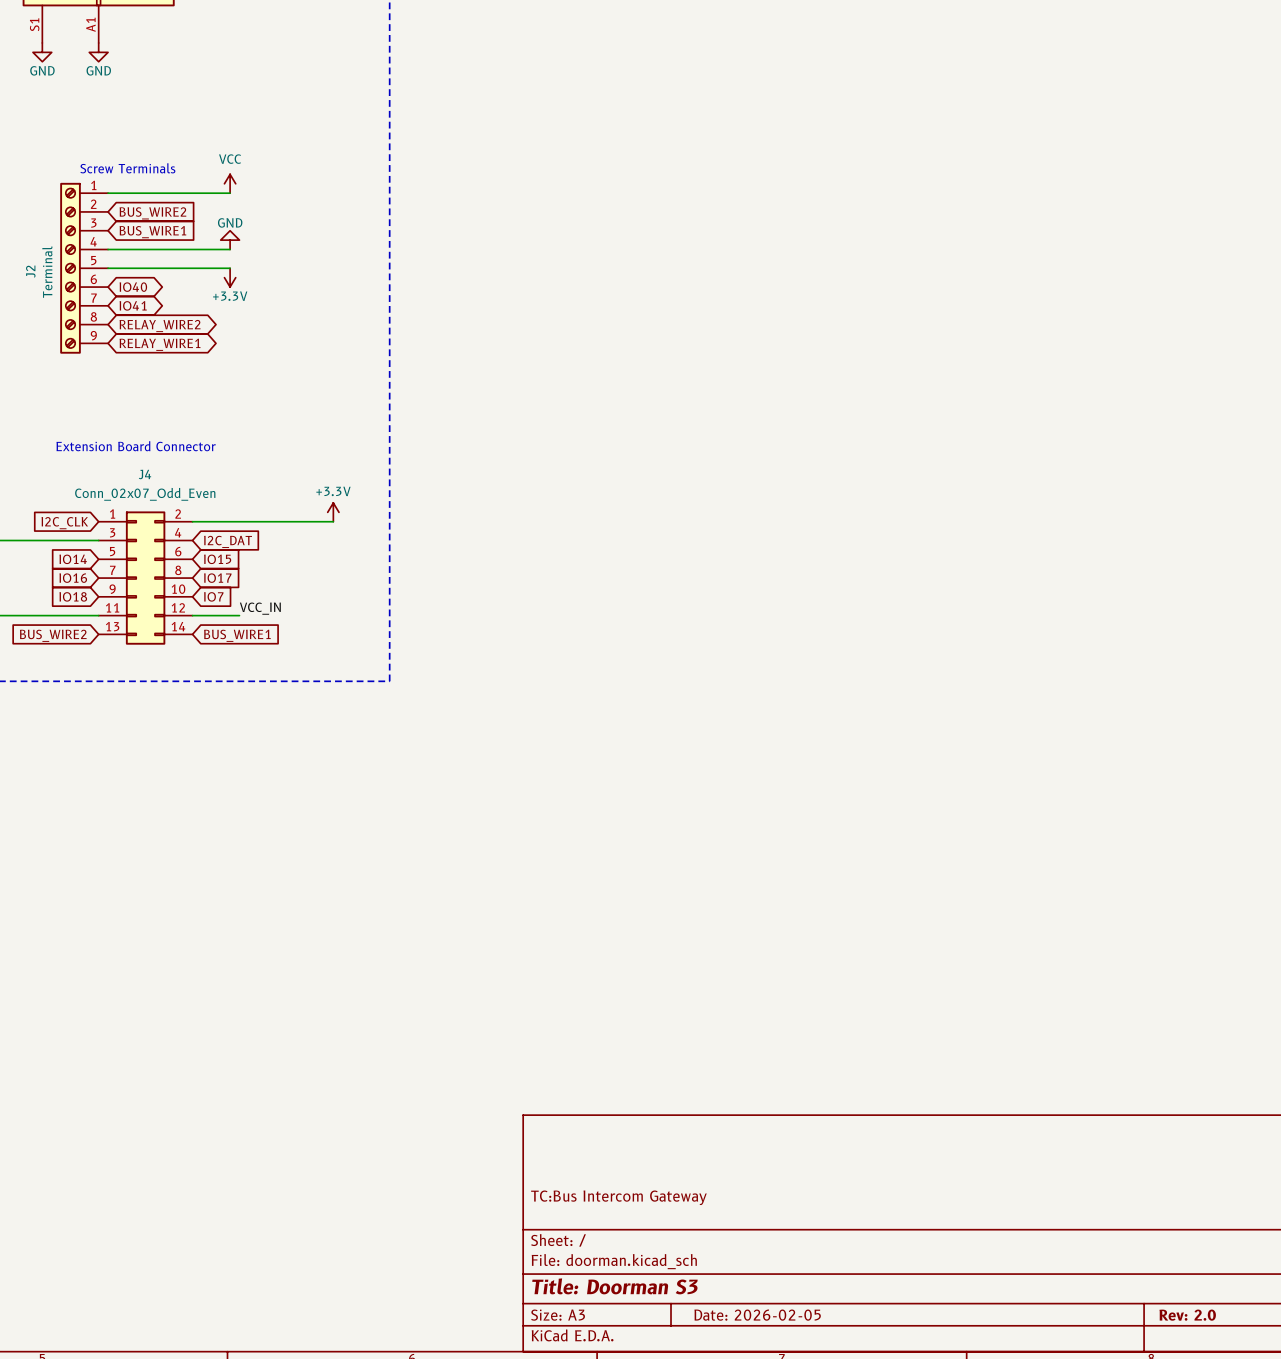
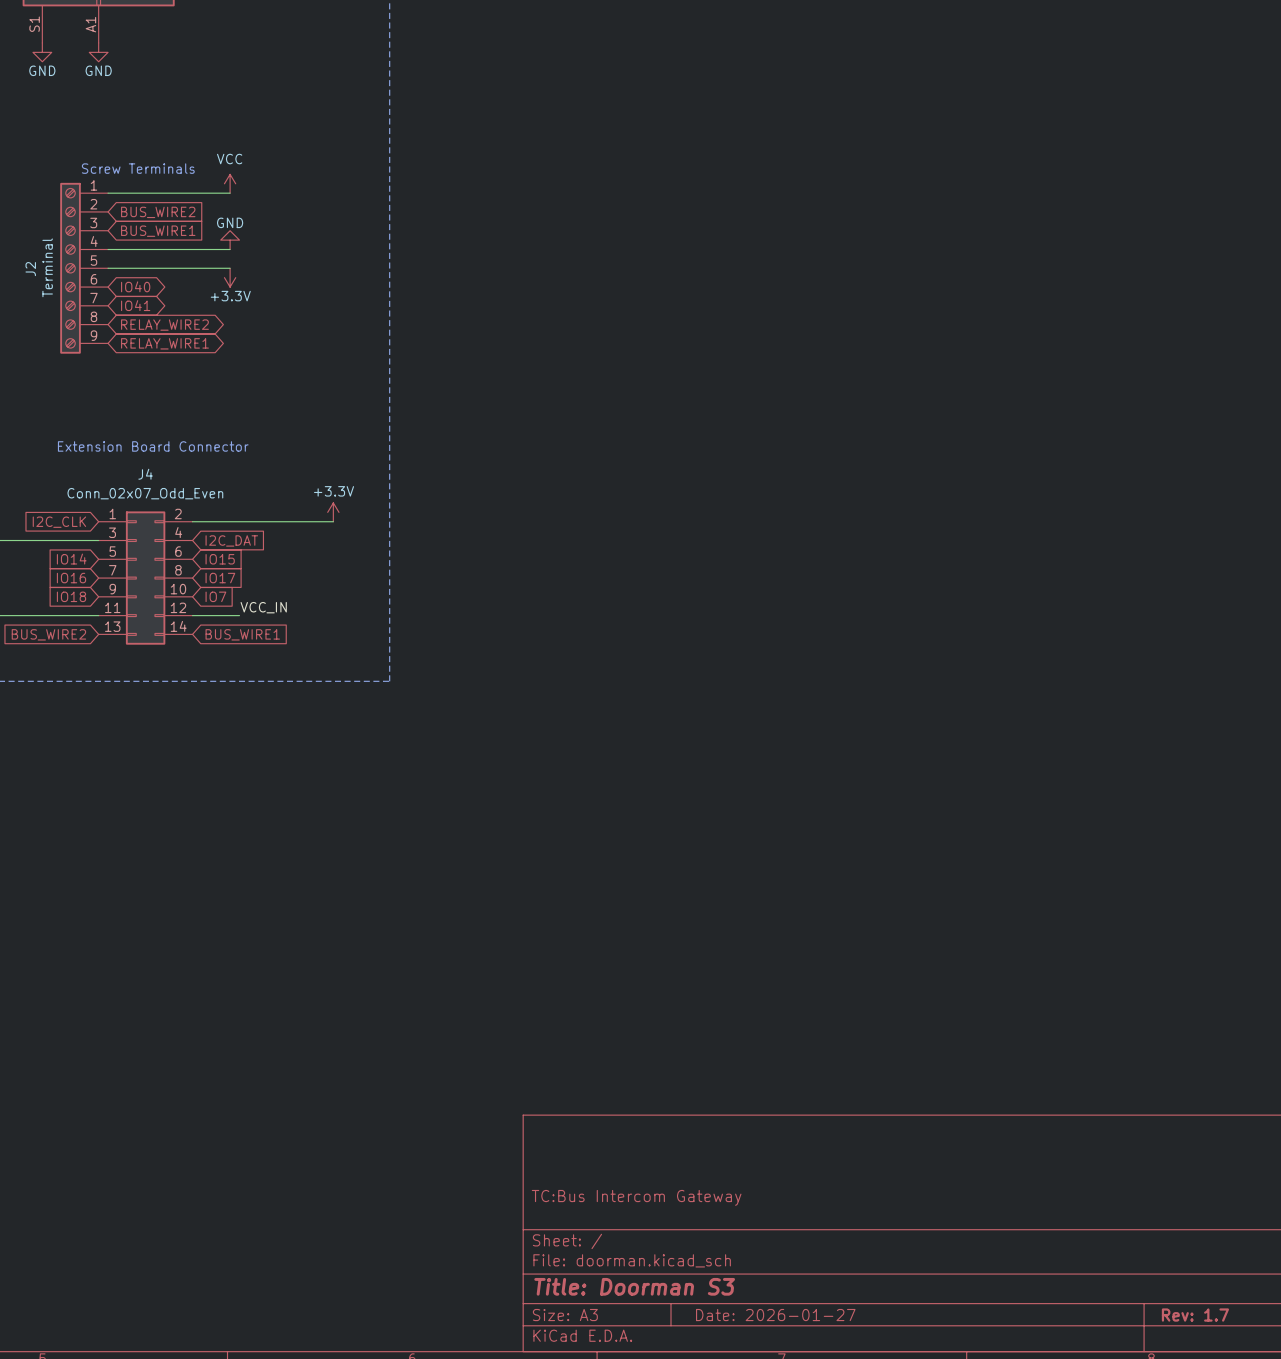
title block: Date: 2026-02-05 (757, 1315) -> Date: 2026-01-27 (775, 1315)
title block: Rev: 2.0 (1187, 1315) -> Rev: 1.7 (1195, 1315)

